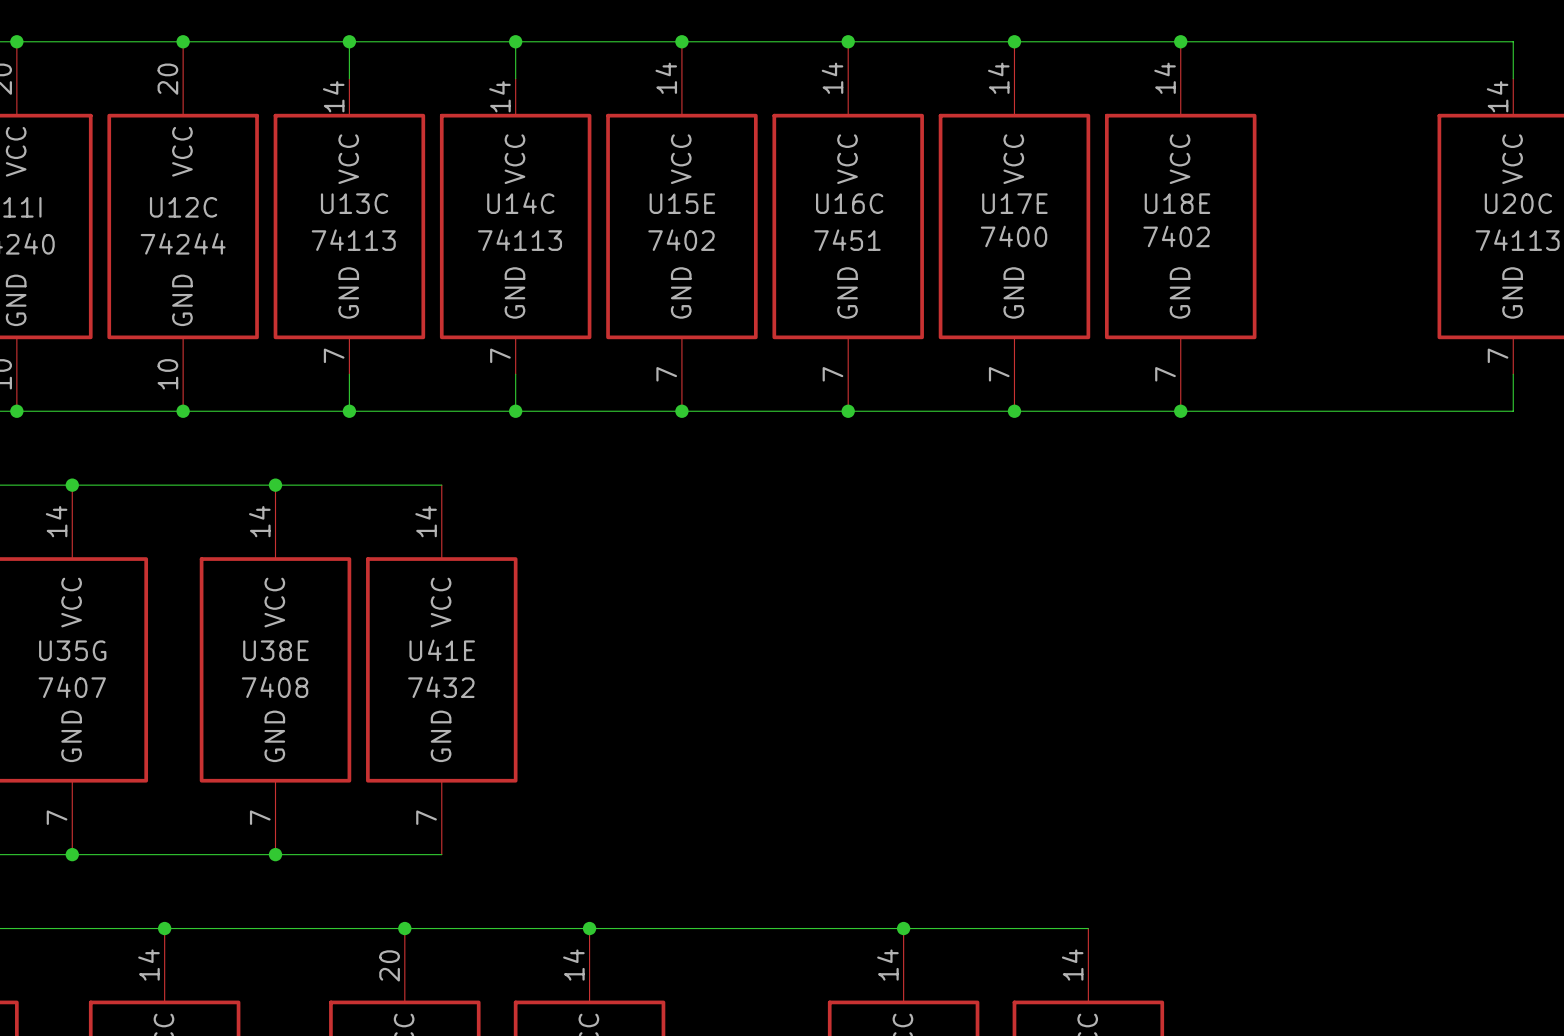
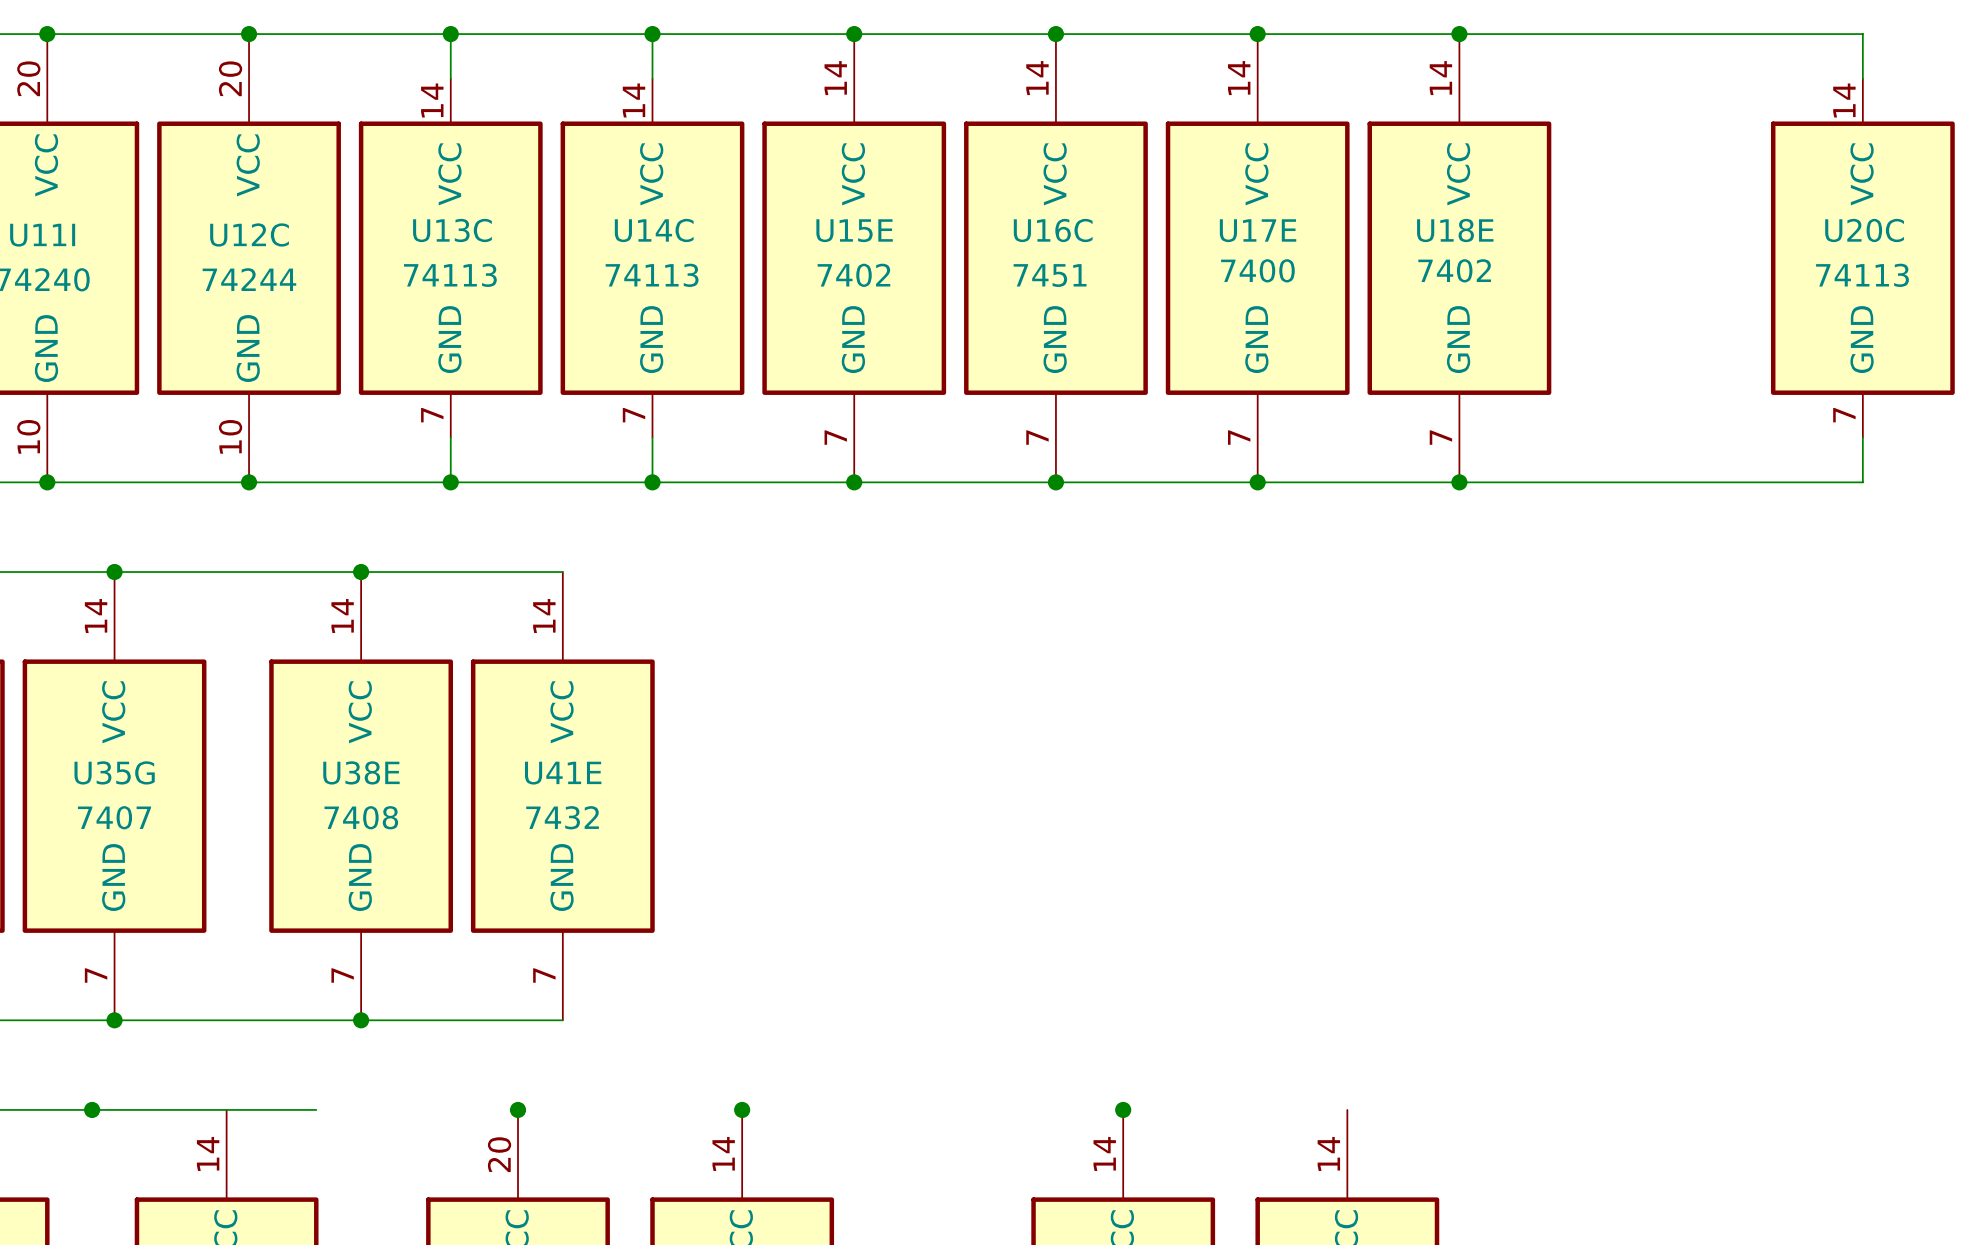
junction: none -> (92, 1109)
junction: (164, 928) -> none
wire: (238, 928) (1088, 928) -> none

